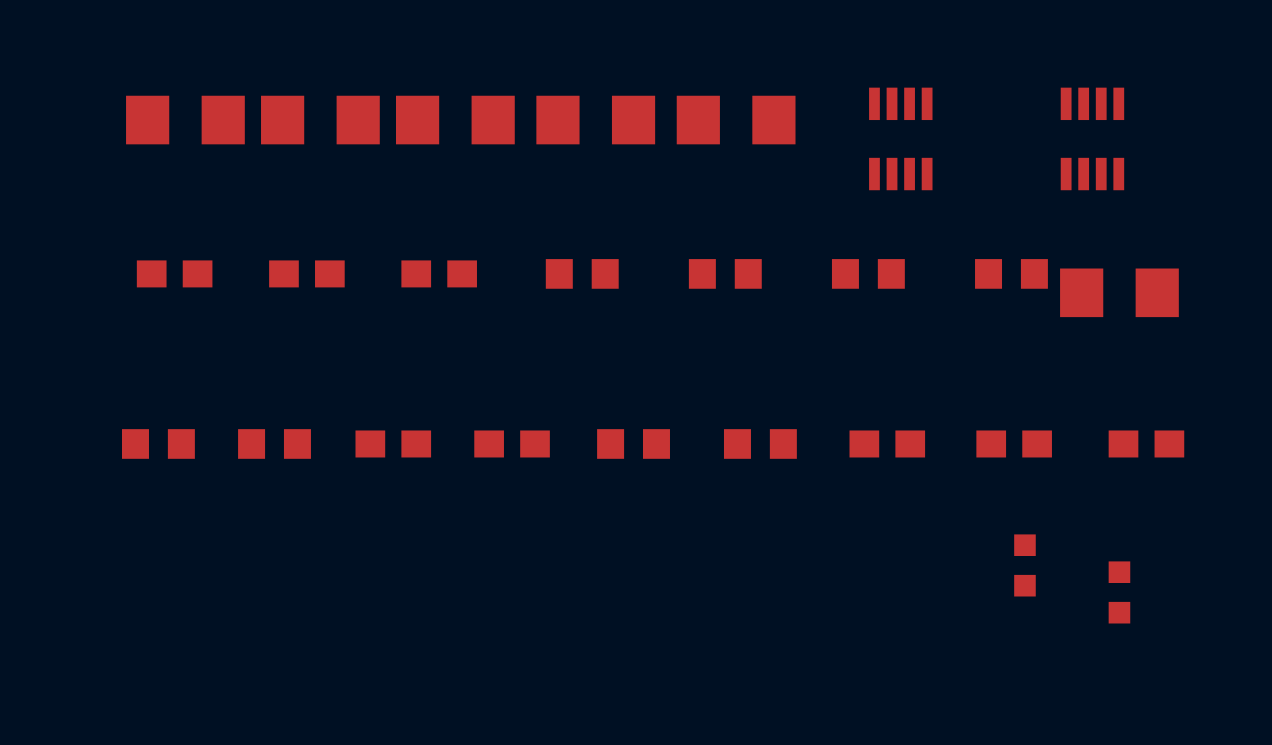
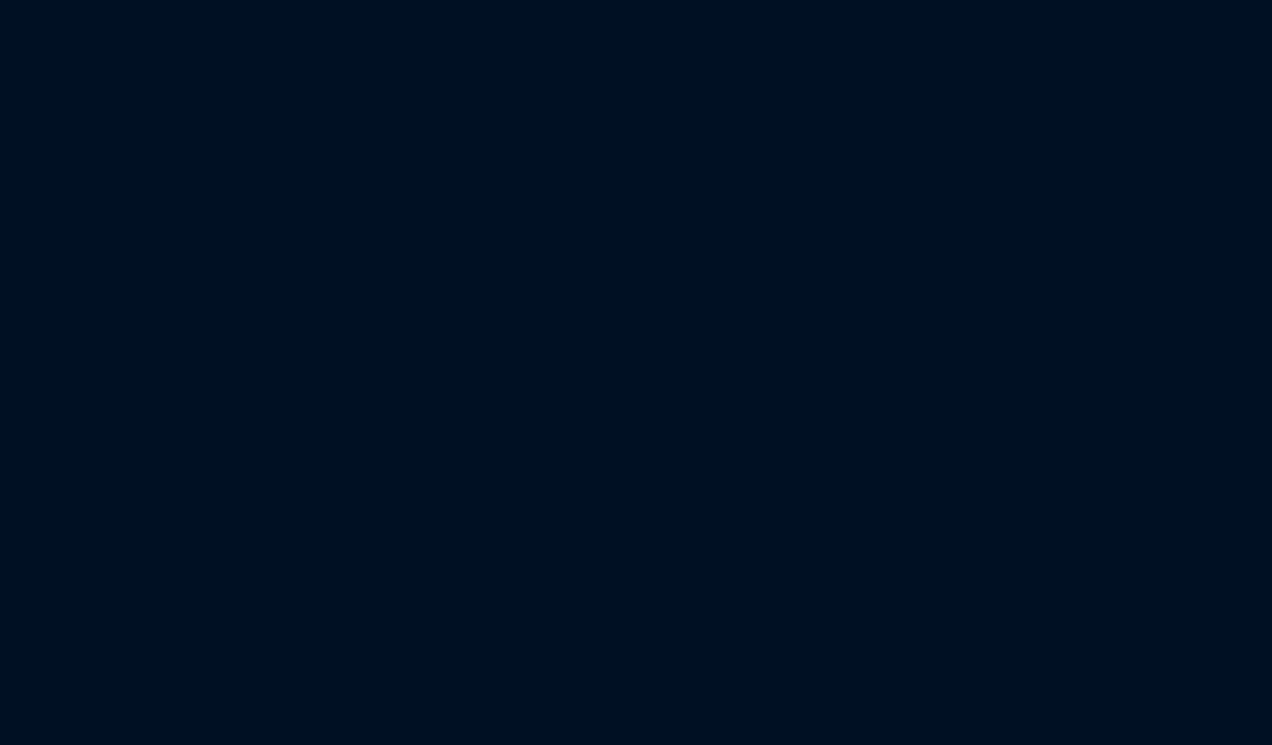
part: (185, 120) -> none
part: (320, 120) -> none
part: (455, 120) -> none
part: (595, 120) -> none
part: (736, 120) -> none
part: (900, 138) -> none
part: (1092, 138) -> none
part: (174, 273) -> none
part: (306, 273) -> none
part: (439, 273) -> none
part: (582, 273) -> none
part: (725, 273) -> none
part: (868, 273) -> none
part: (1011, 273) -> none
part: (1119, 292) -> none
part: (158, 443) -> none
part: (274, 443) -> none
part: (393, 443) -> none
part: (512, 443) -> none
part: (633, 443) -> none
part: (760, 443) -> none
part: (887, 443) -> none
part: (1014, 443) -> none
part: (1146, 443) -> none
part: (1024, 565) -> none
part: (1119, 592) -> none

